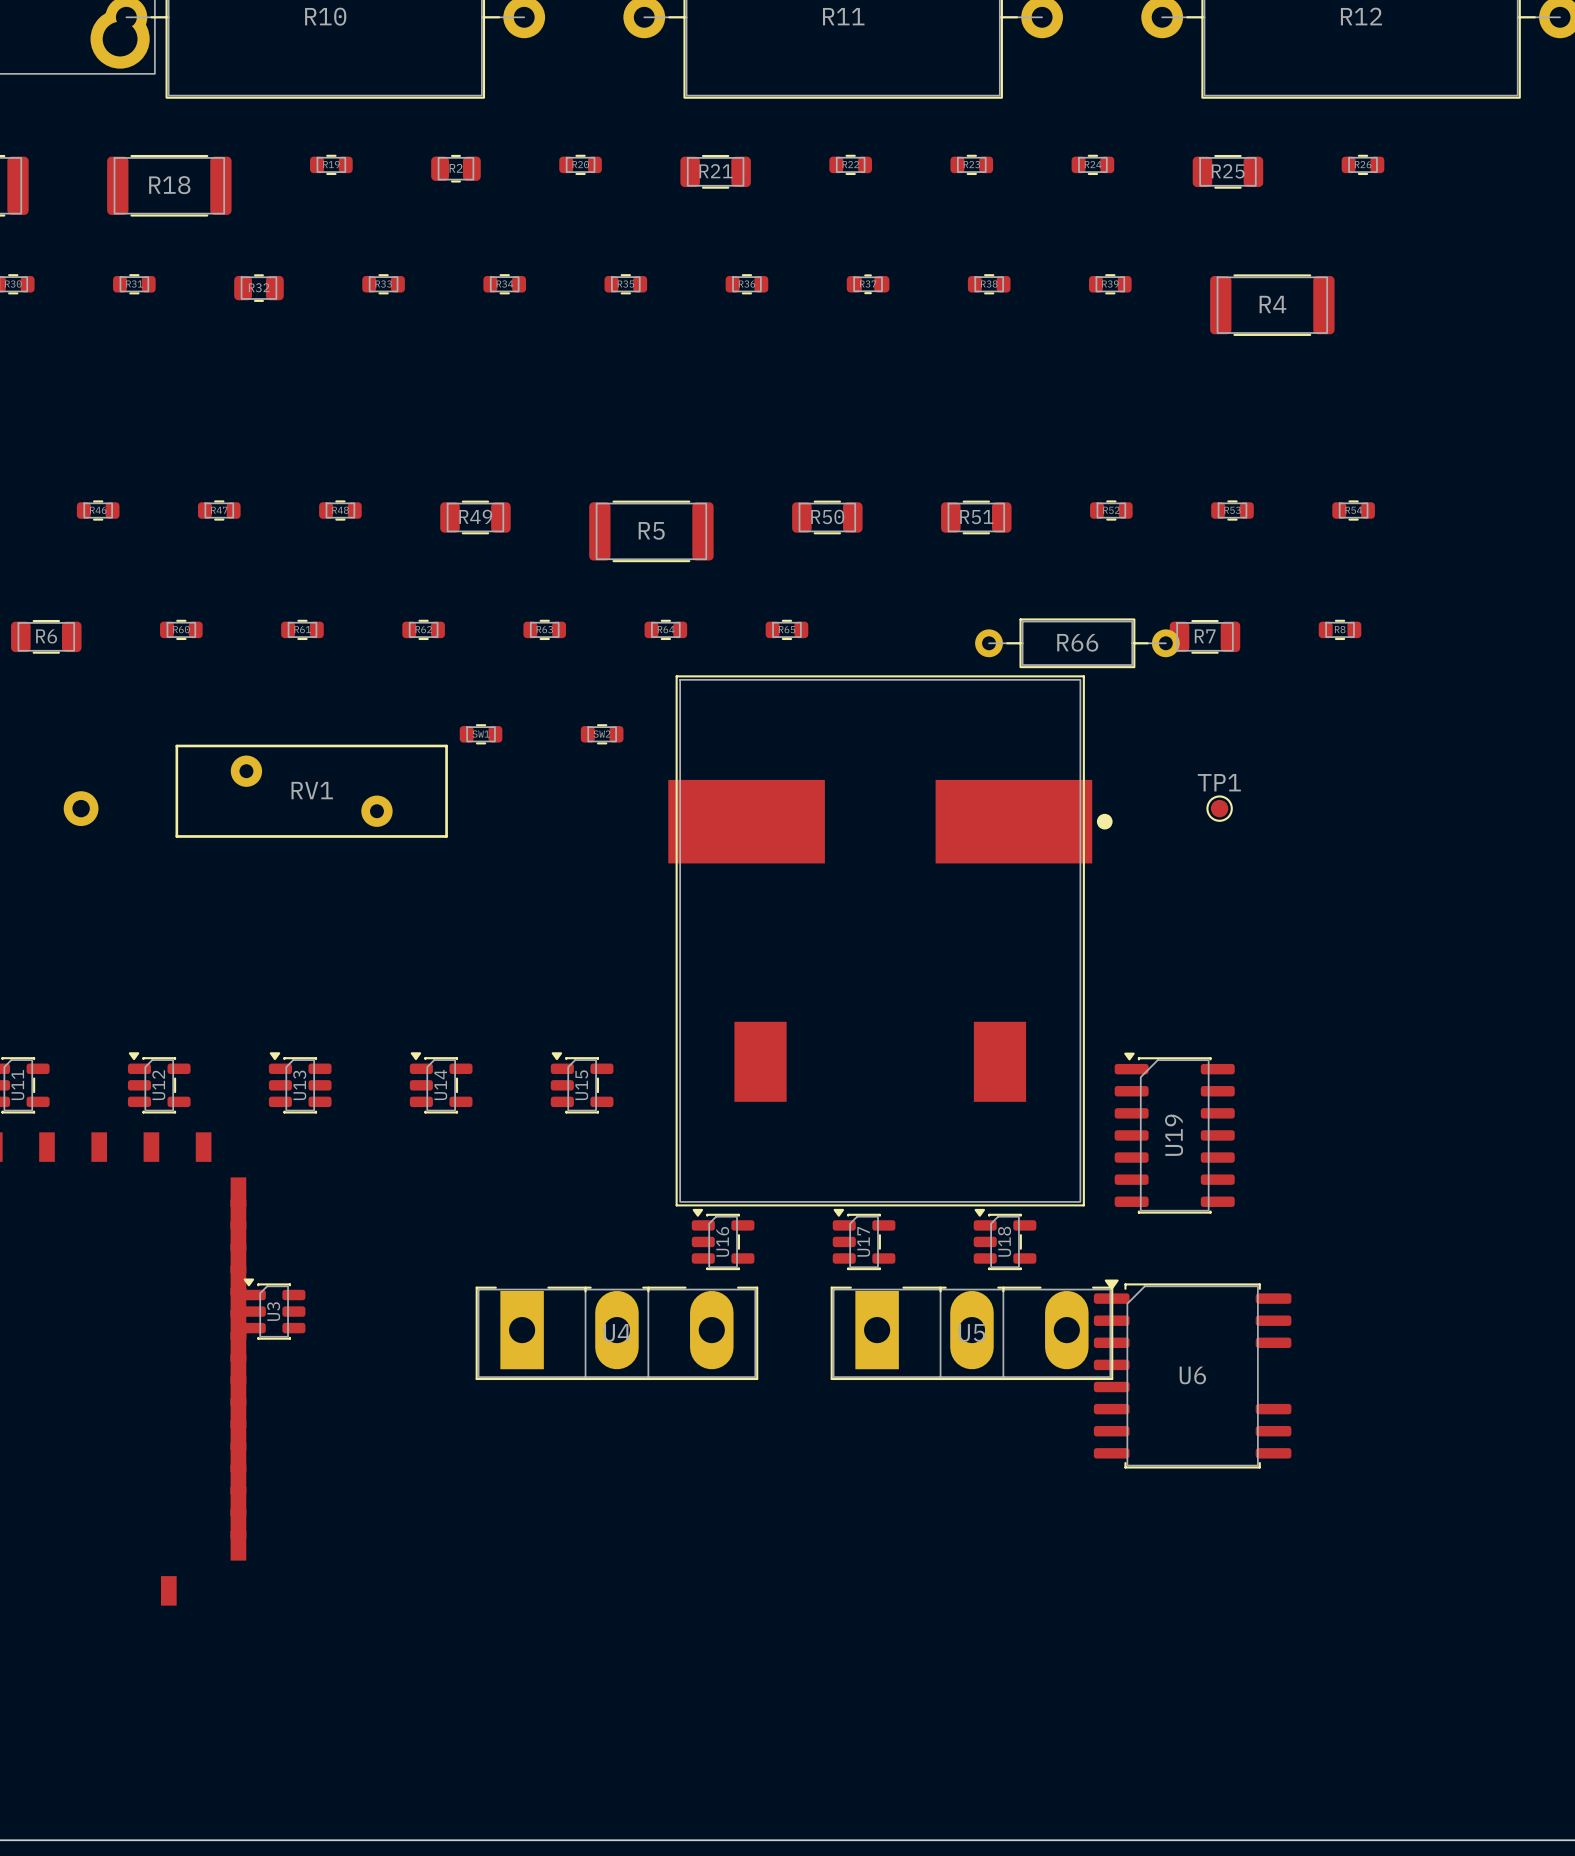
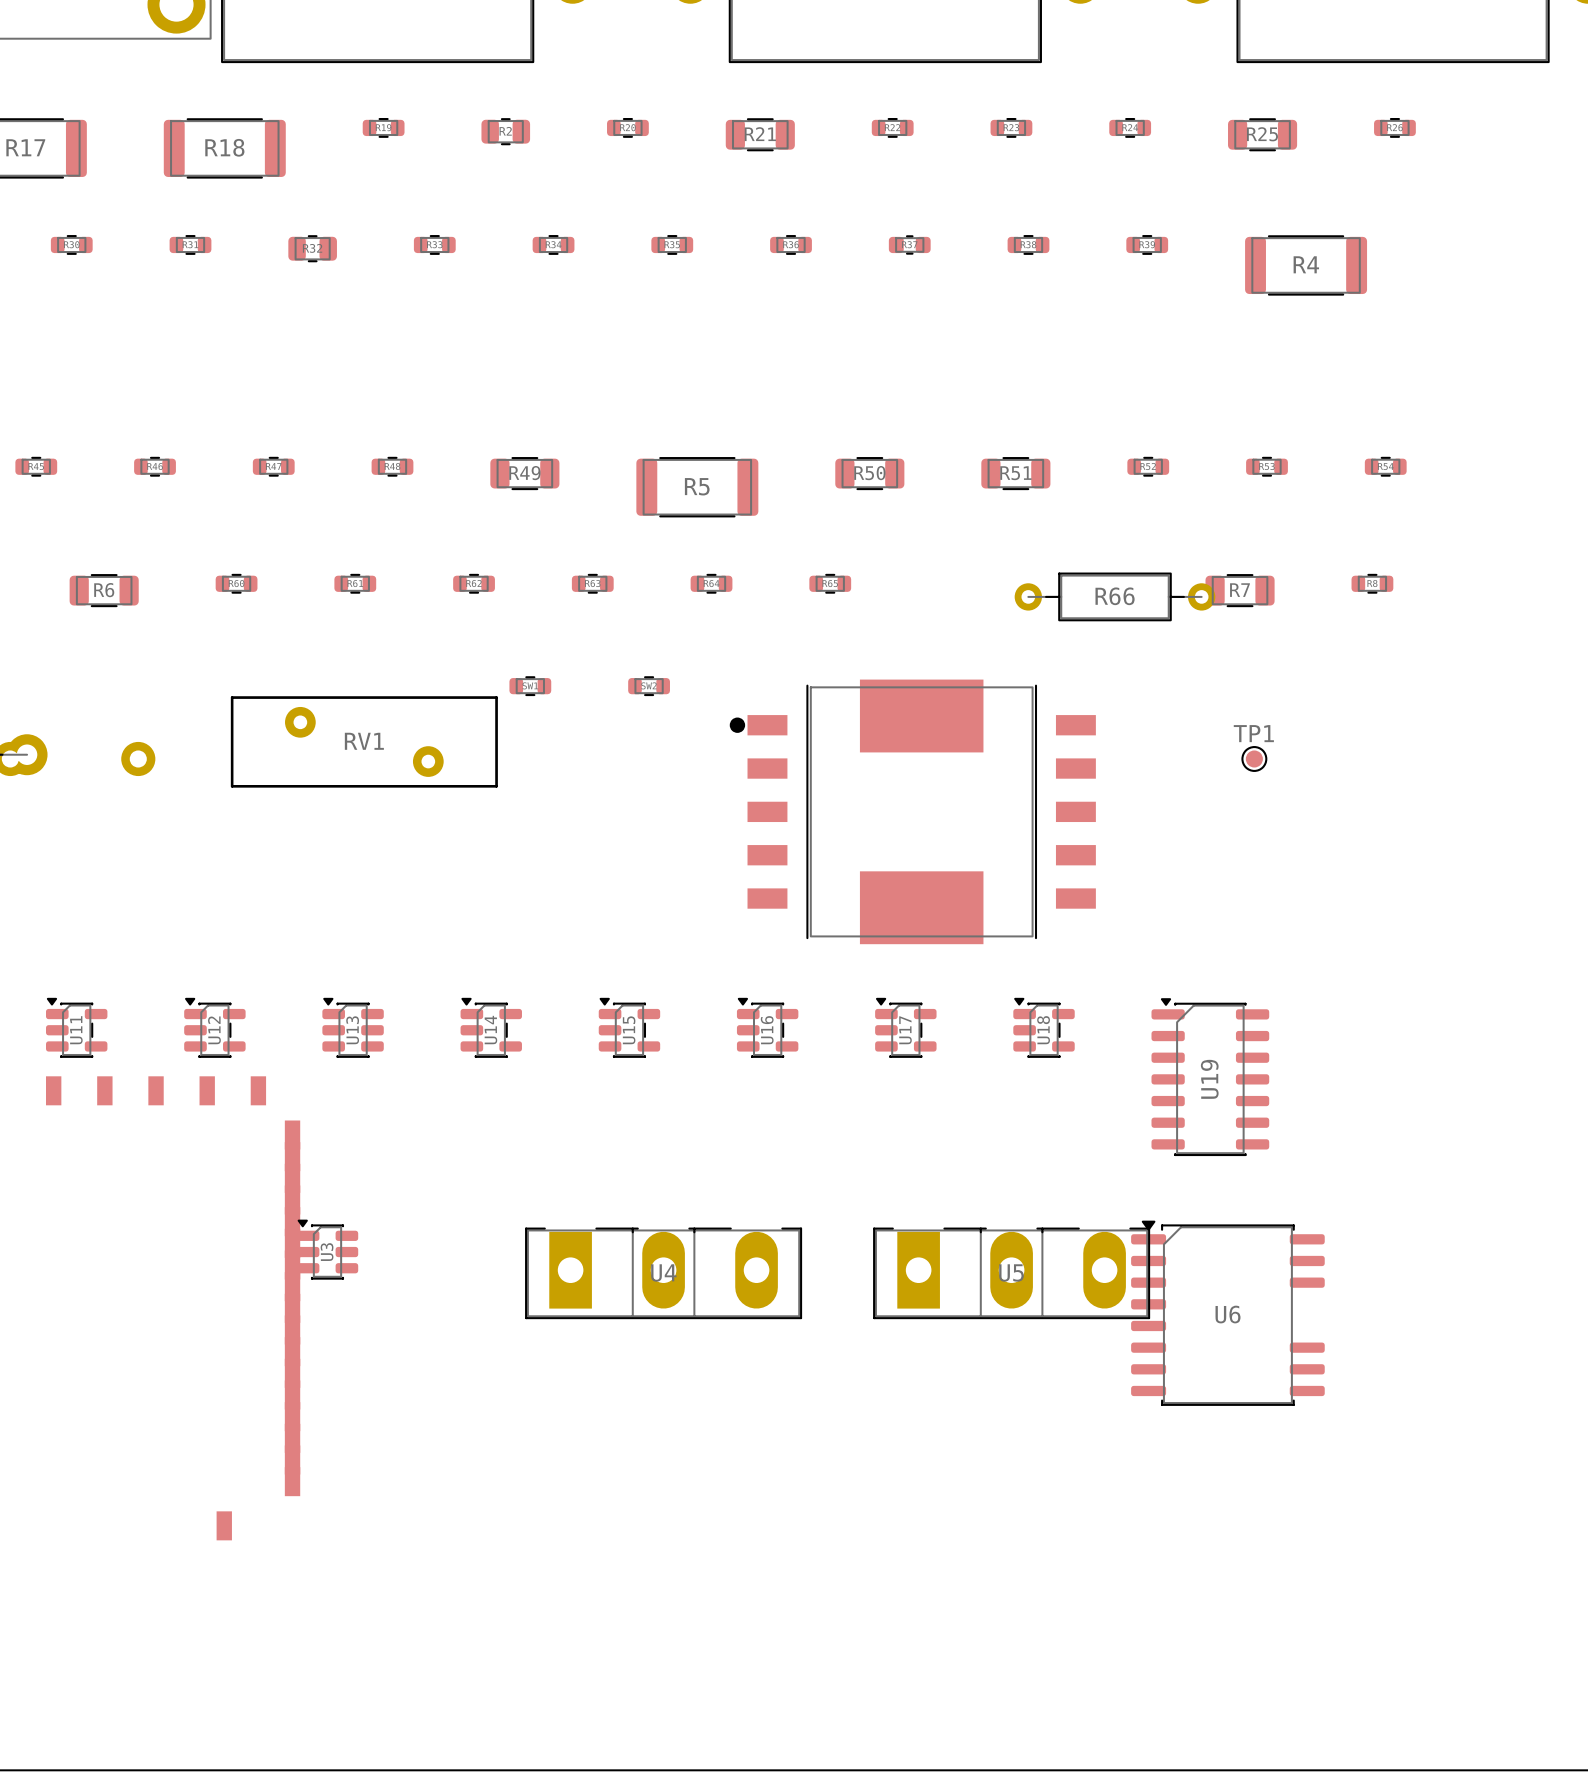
part: none -> (912, 811)
part: (890, 940) -> none
U16 position: (723, 1239) -> (767, 1027)
U17 position: (864, 1239) -> (905, 1027)
U18 position: (1005, 1239) -> (1044, 1027)

